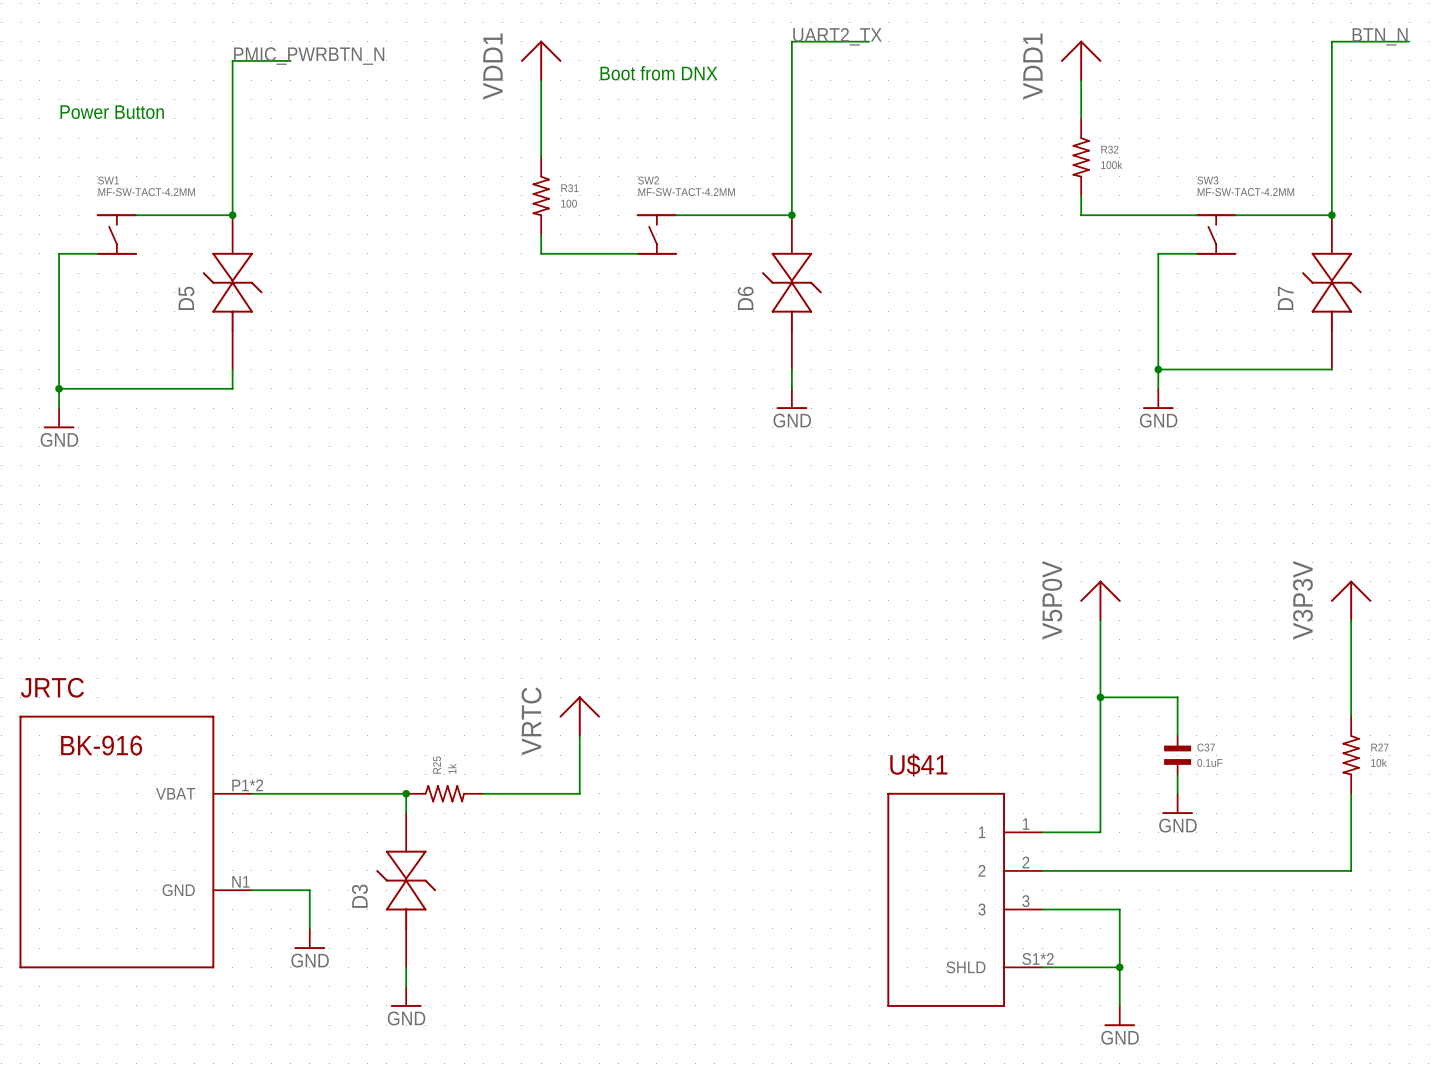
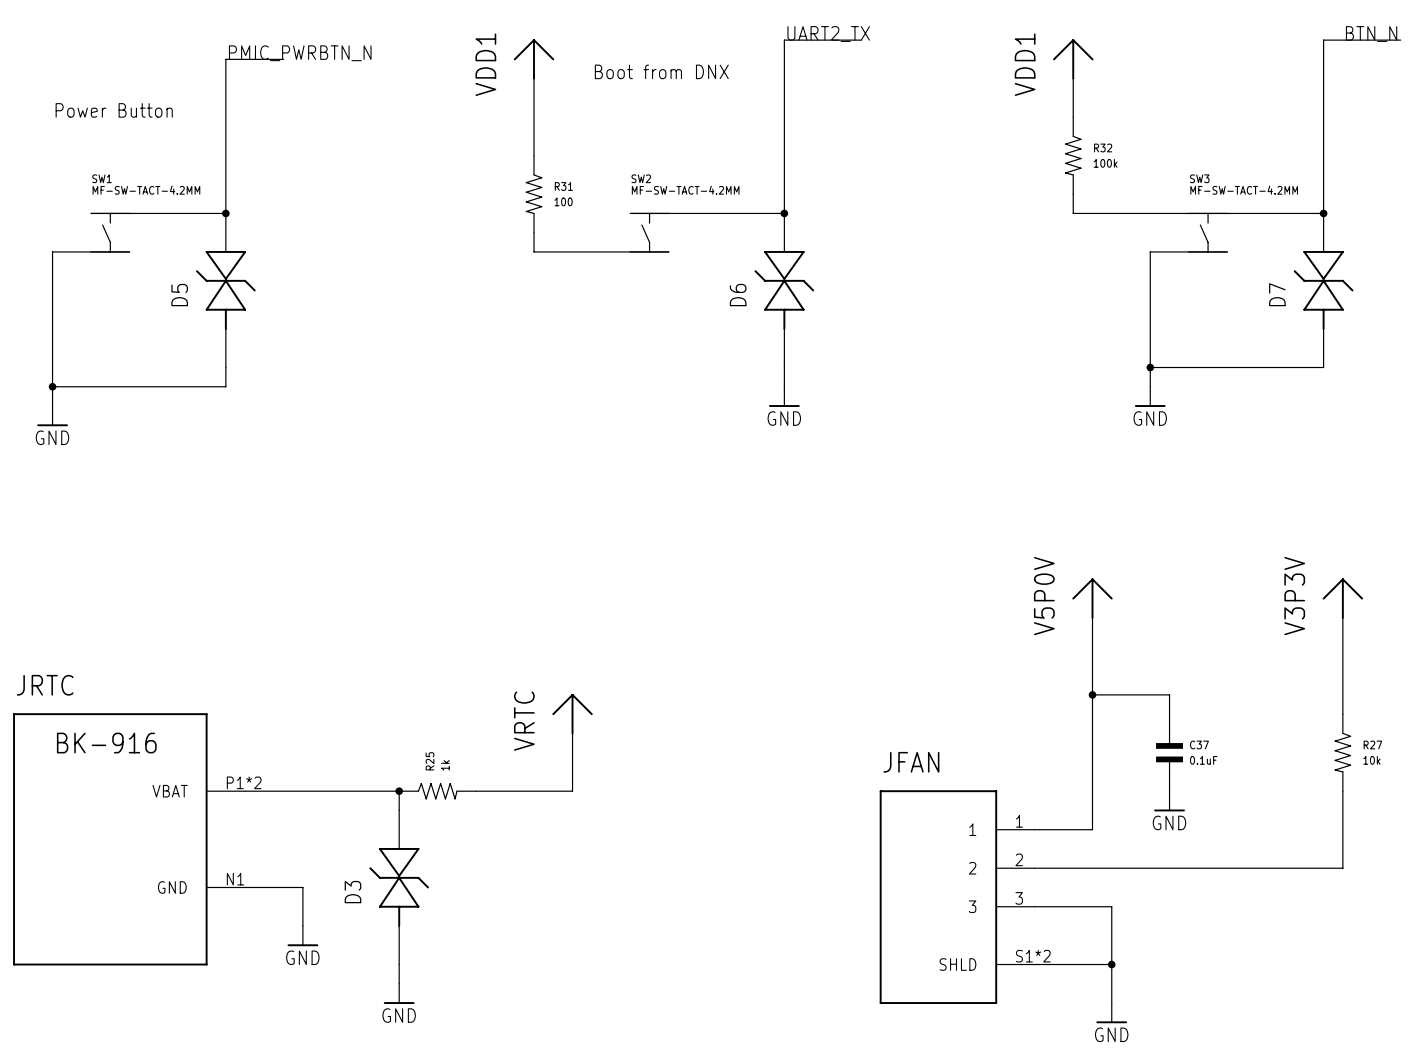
U$41 name: U$41 (918, 765) -> JFAN (911, 762)

